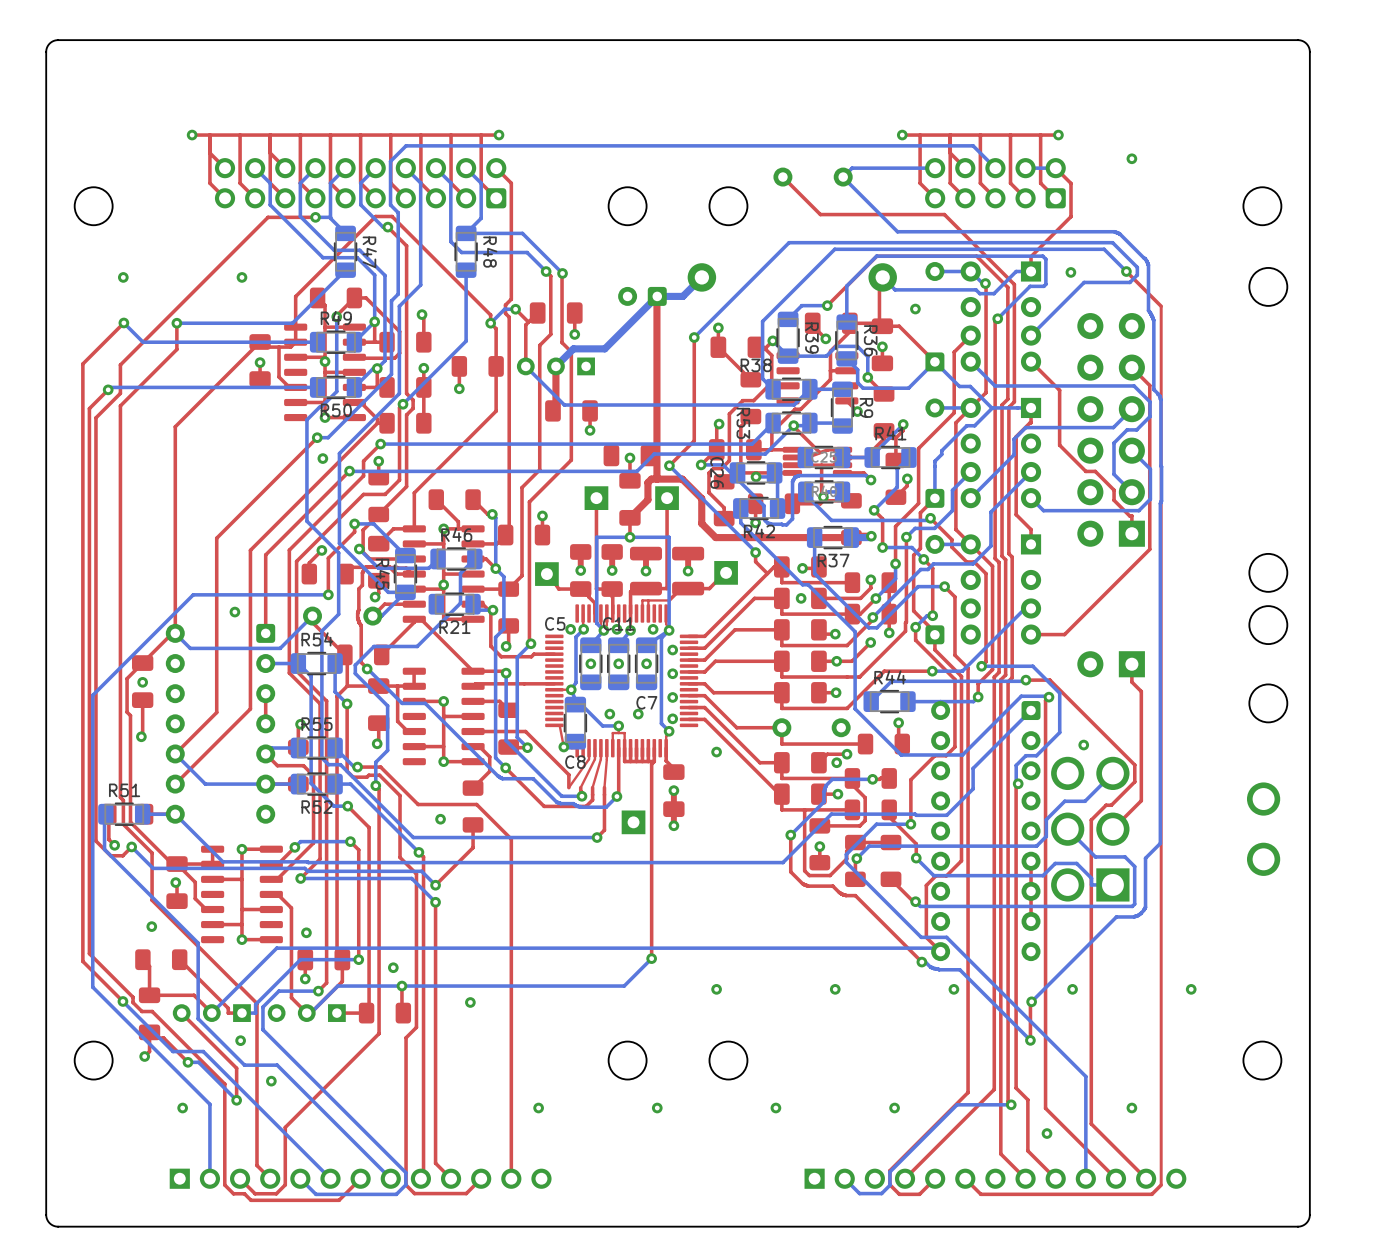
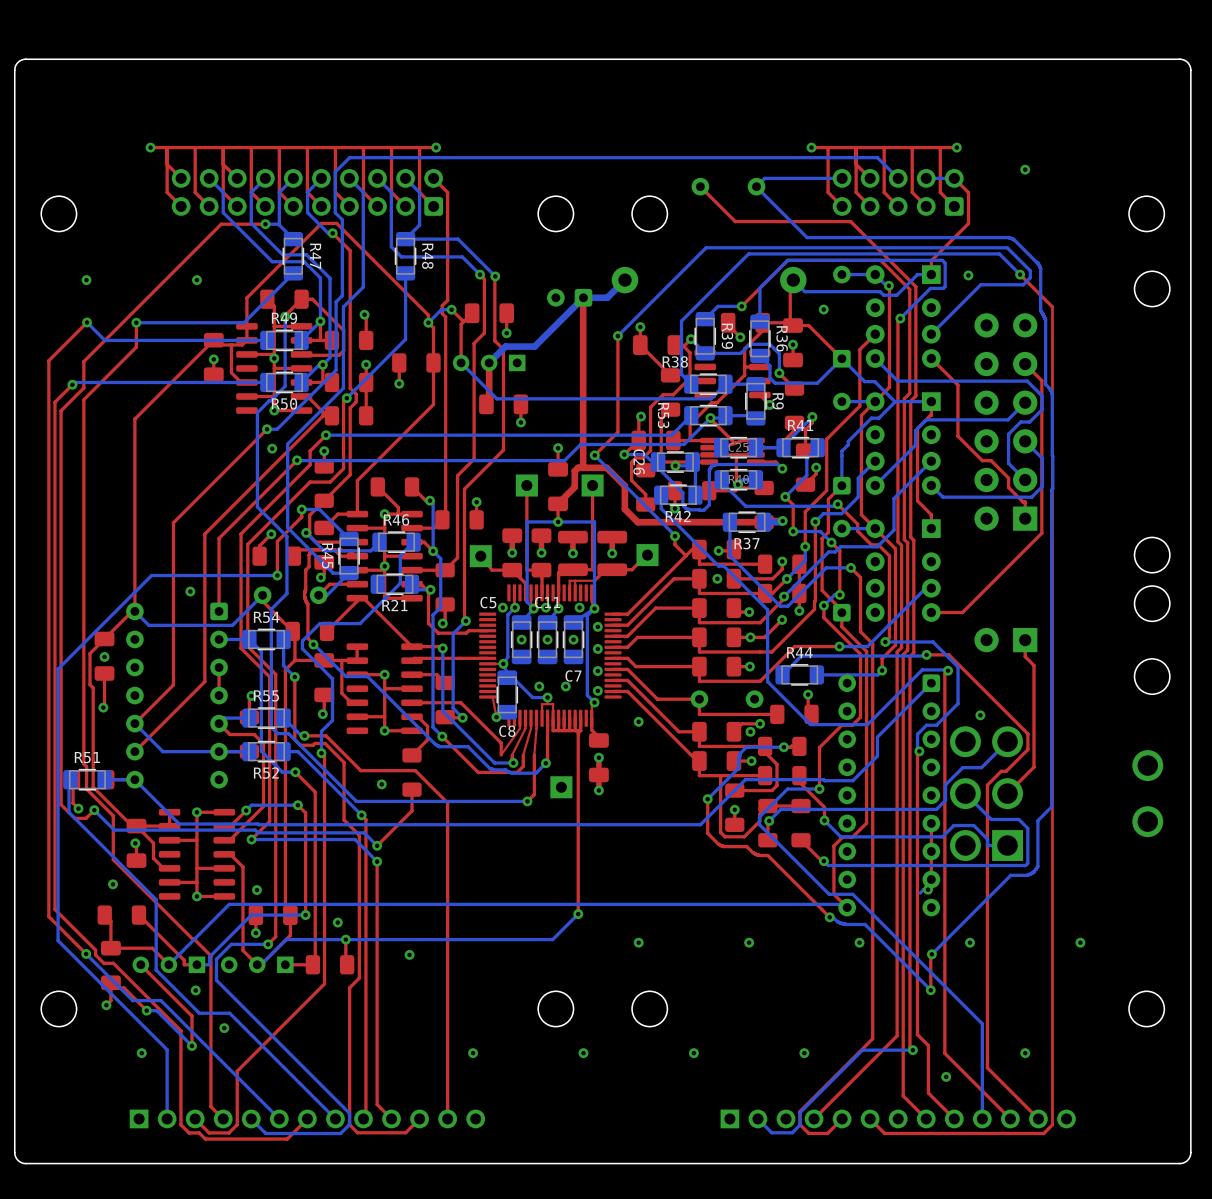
part: (629, 455) -> none
bottom track: none -> (928, 889) (923, 889) (920, 893)
via: none -> (928, 889)

